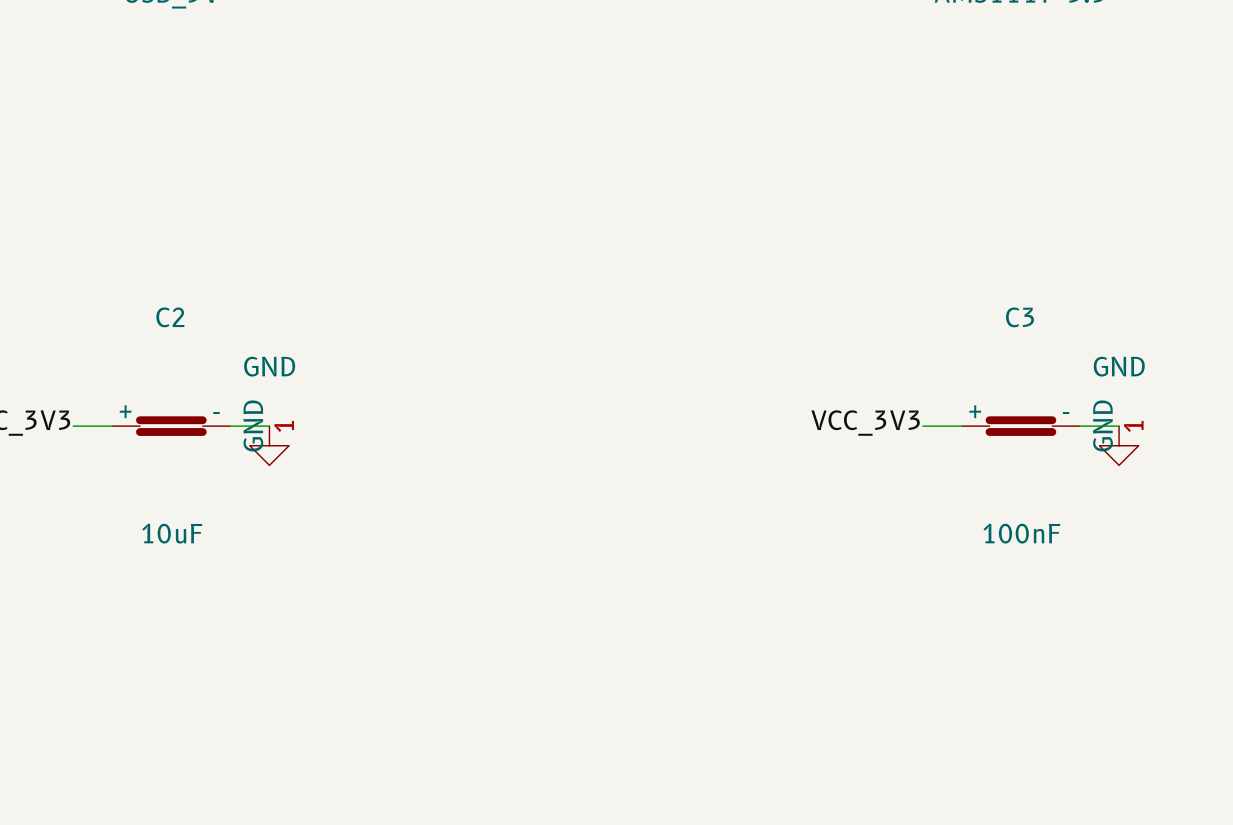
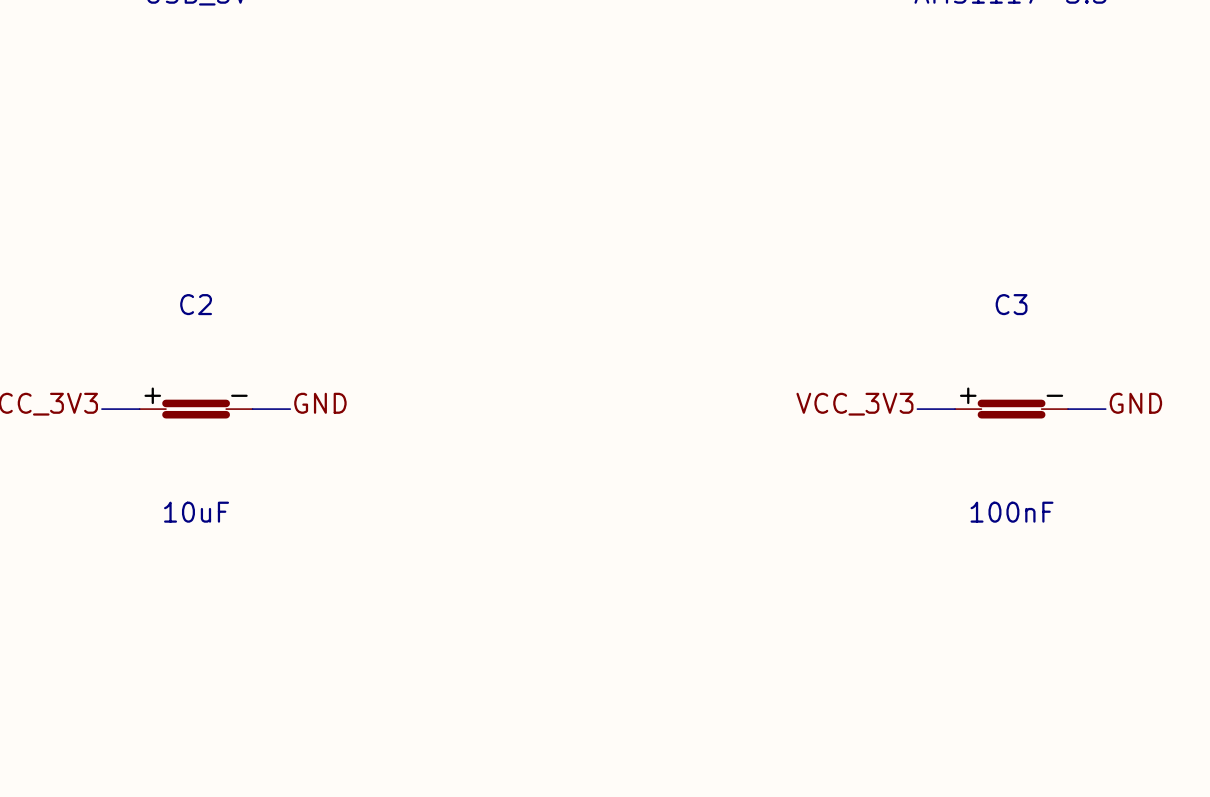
label: none -> GND (320, 403)
label: none -> GND (1135, 403)
power symbol: GND (269, 445) -> none
power symbol: GND (1119, 445) -> none

